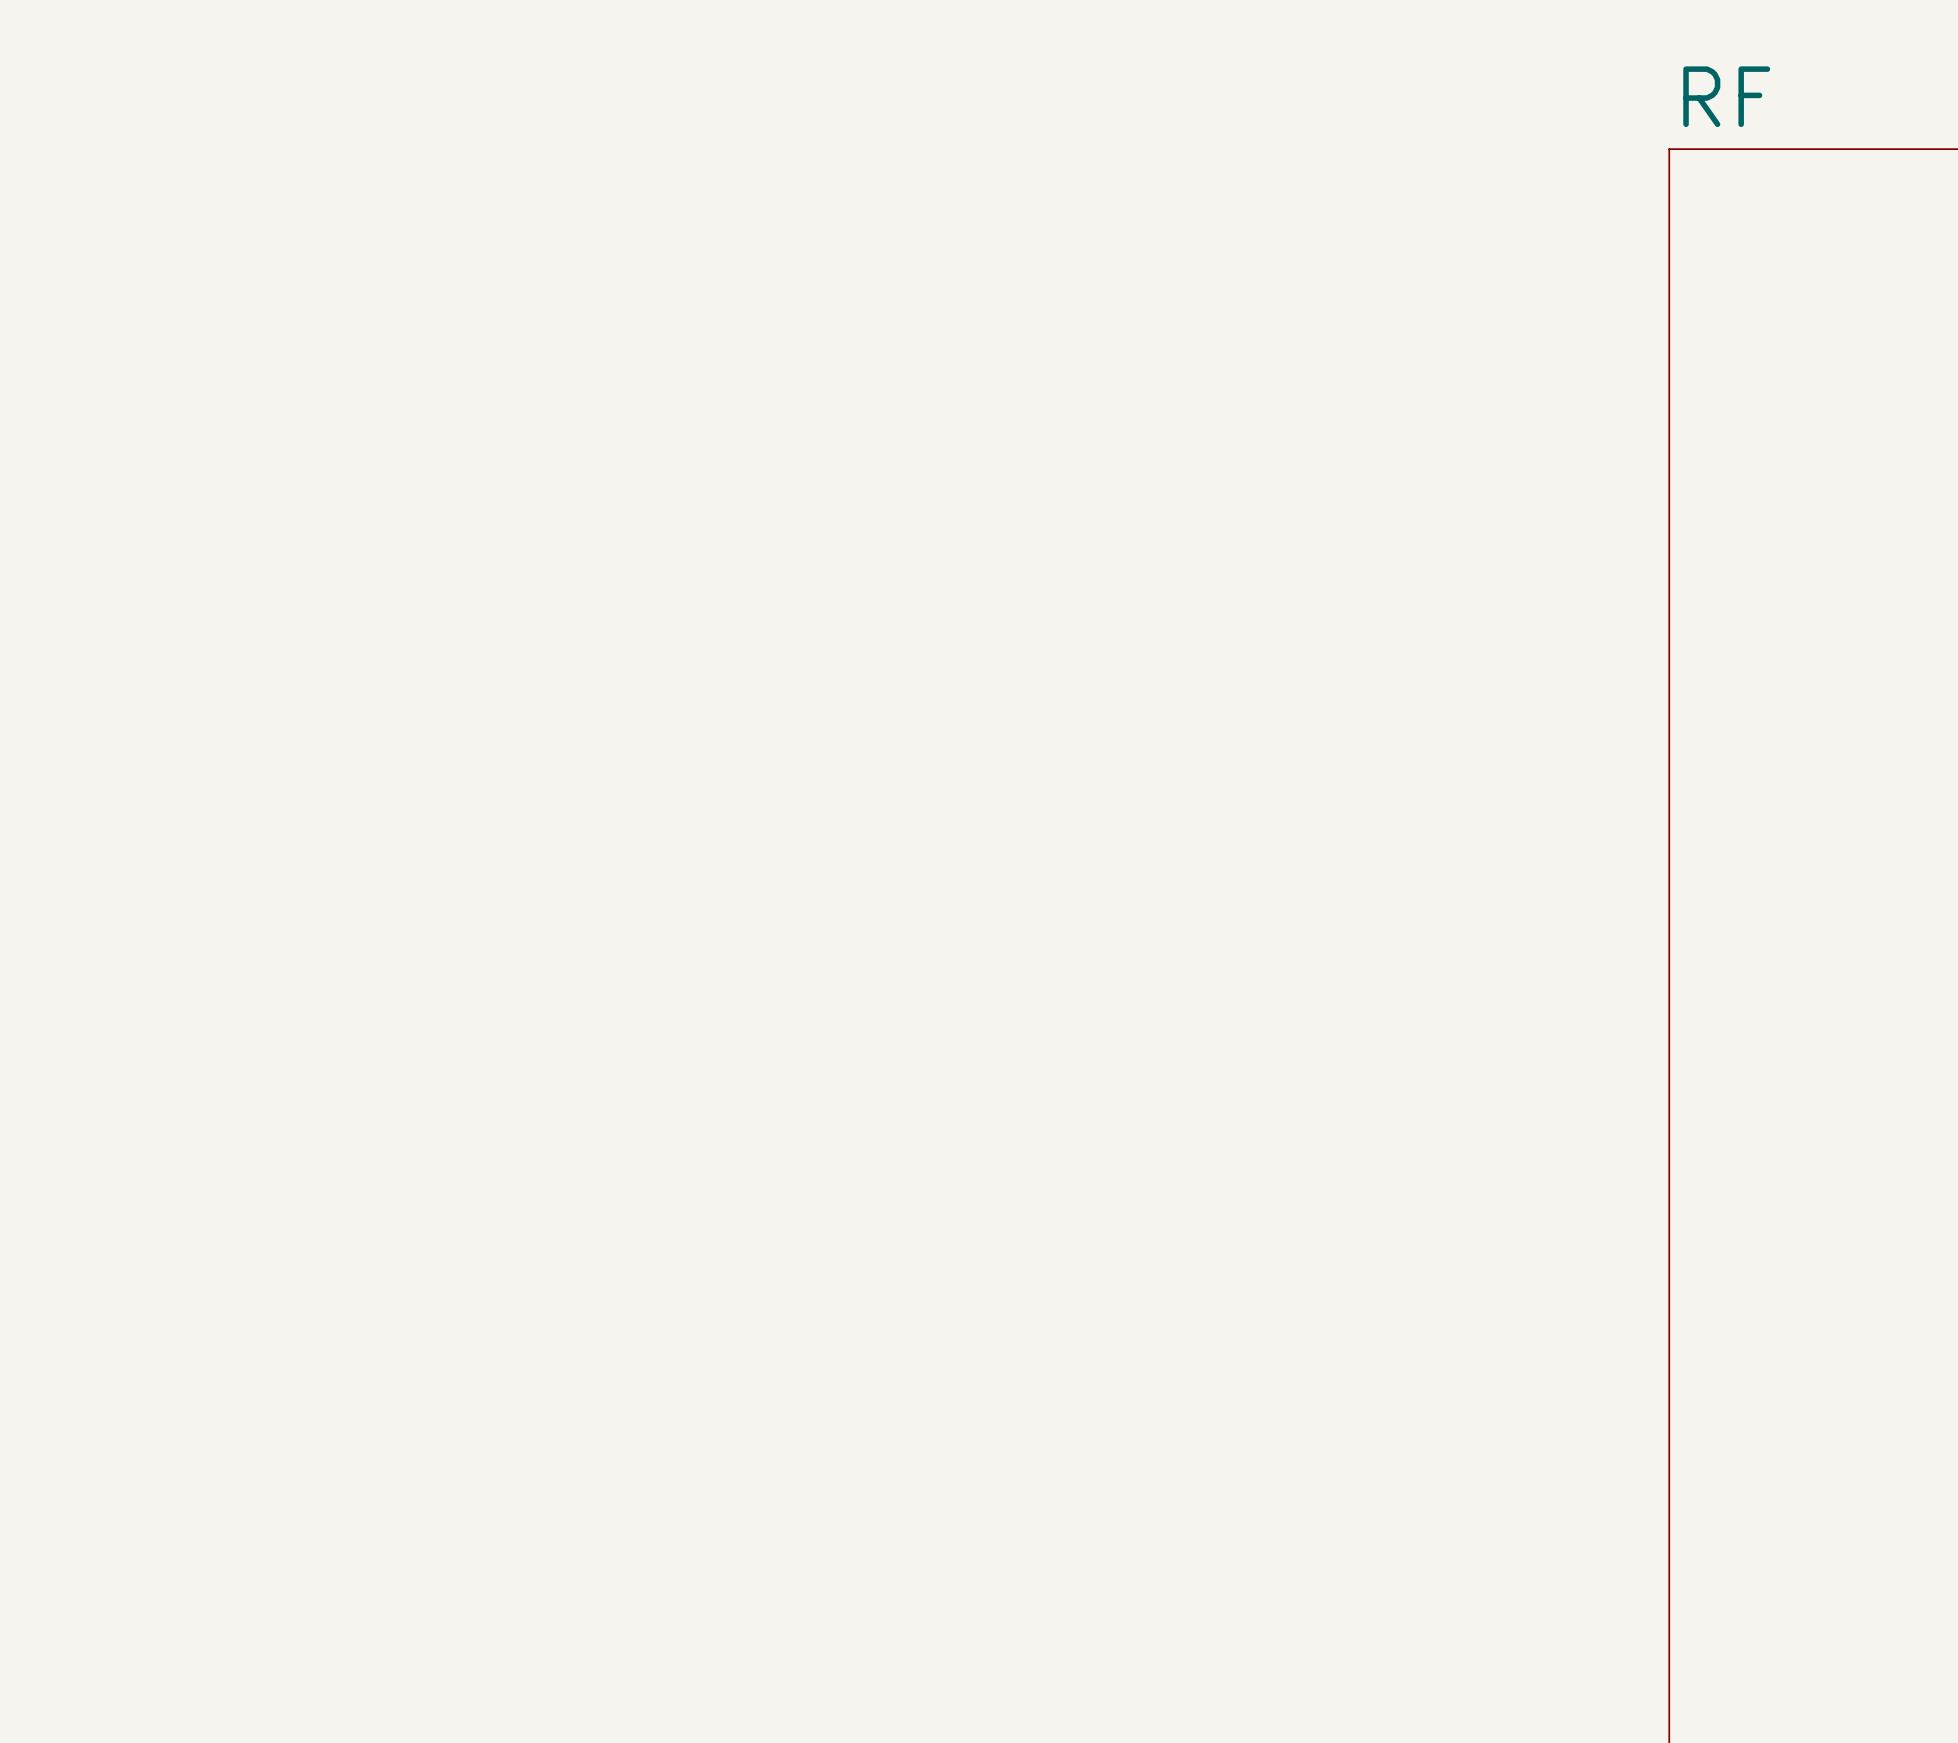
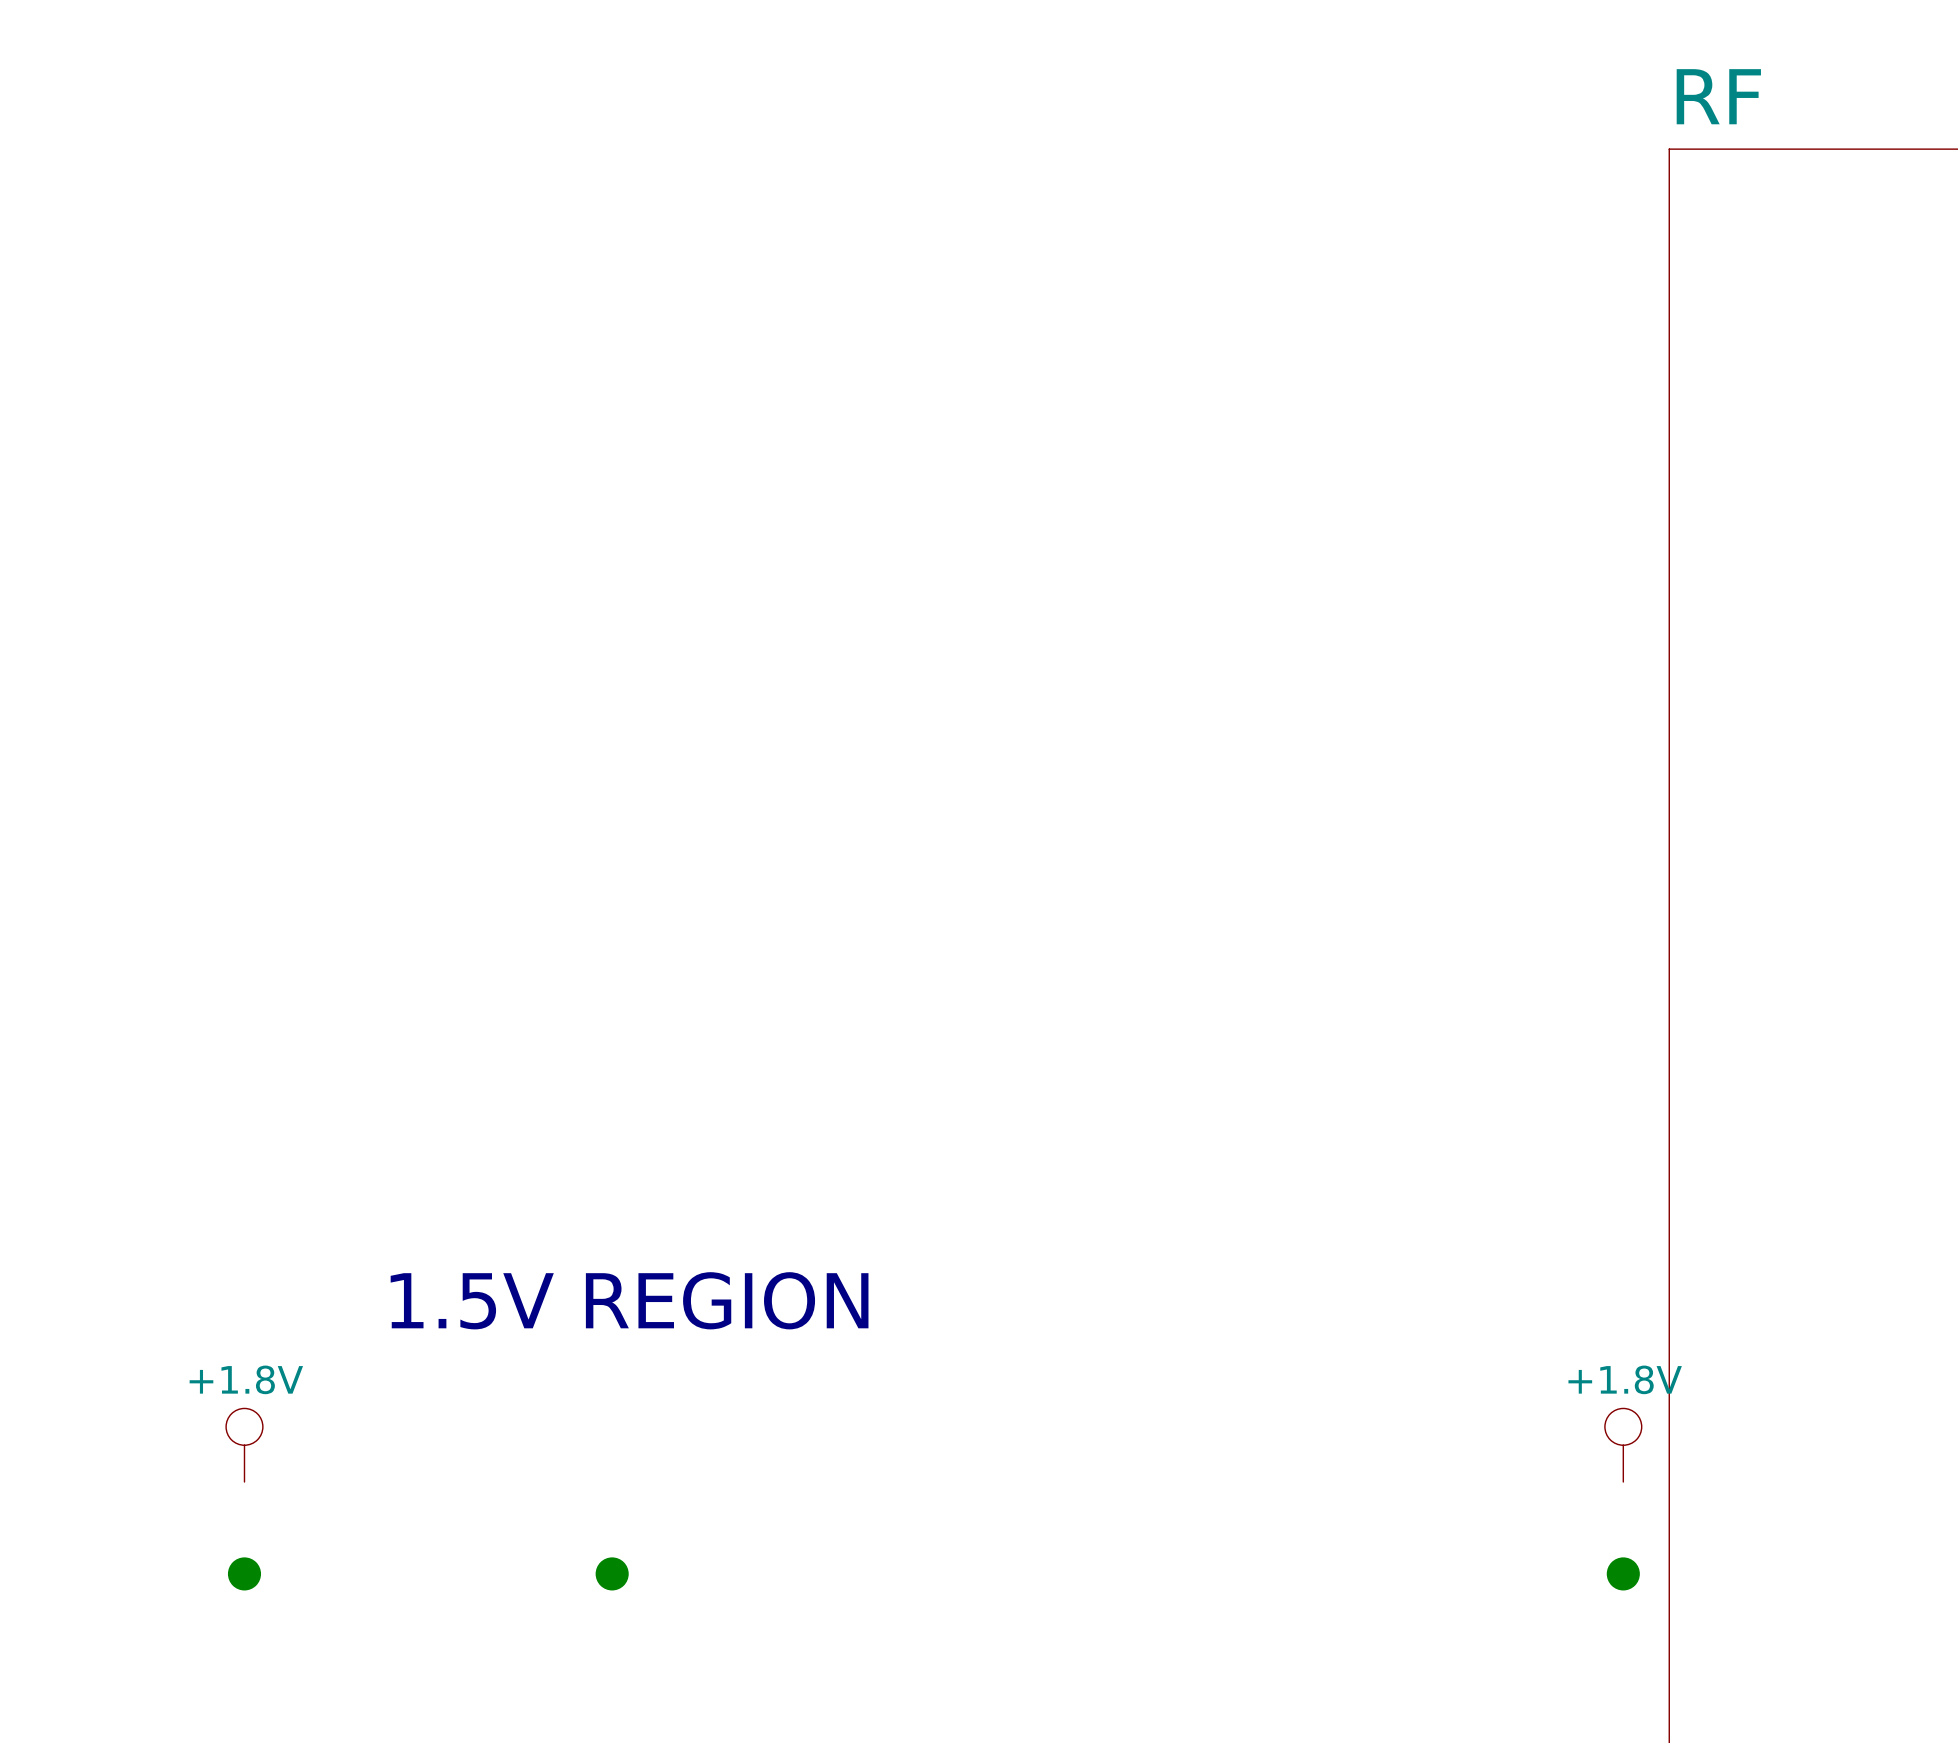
text: none -> 1.5V REGION (629, 1300)
power symbol: none -> +1.8V (244, 1445)
power symbol: none -> +1.8V (1623, 1445)
junction: none -> (244, 1573)
junction: none -> (612, 1573)
junction: none -> (1623, 1573)

